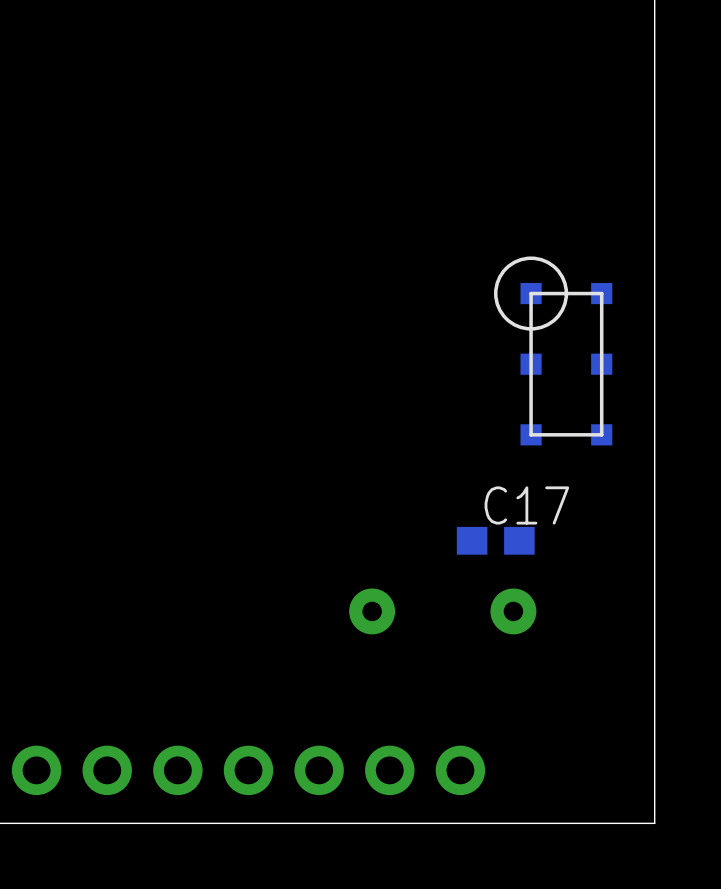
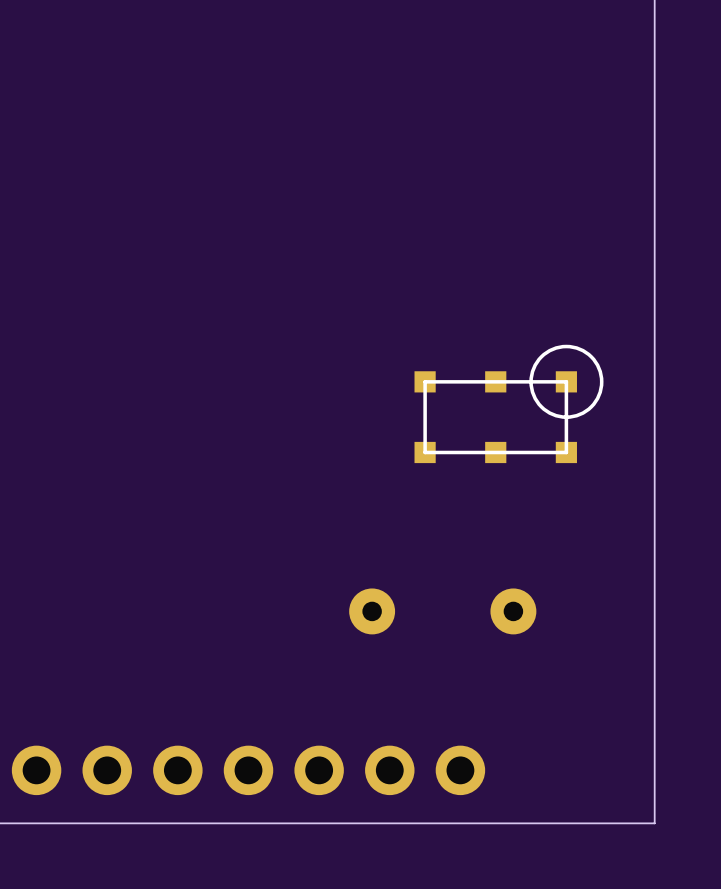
part rotation: 0° (553, 350) -> 90° clockwise (508, 403)
C17: (495, 540) -> none

